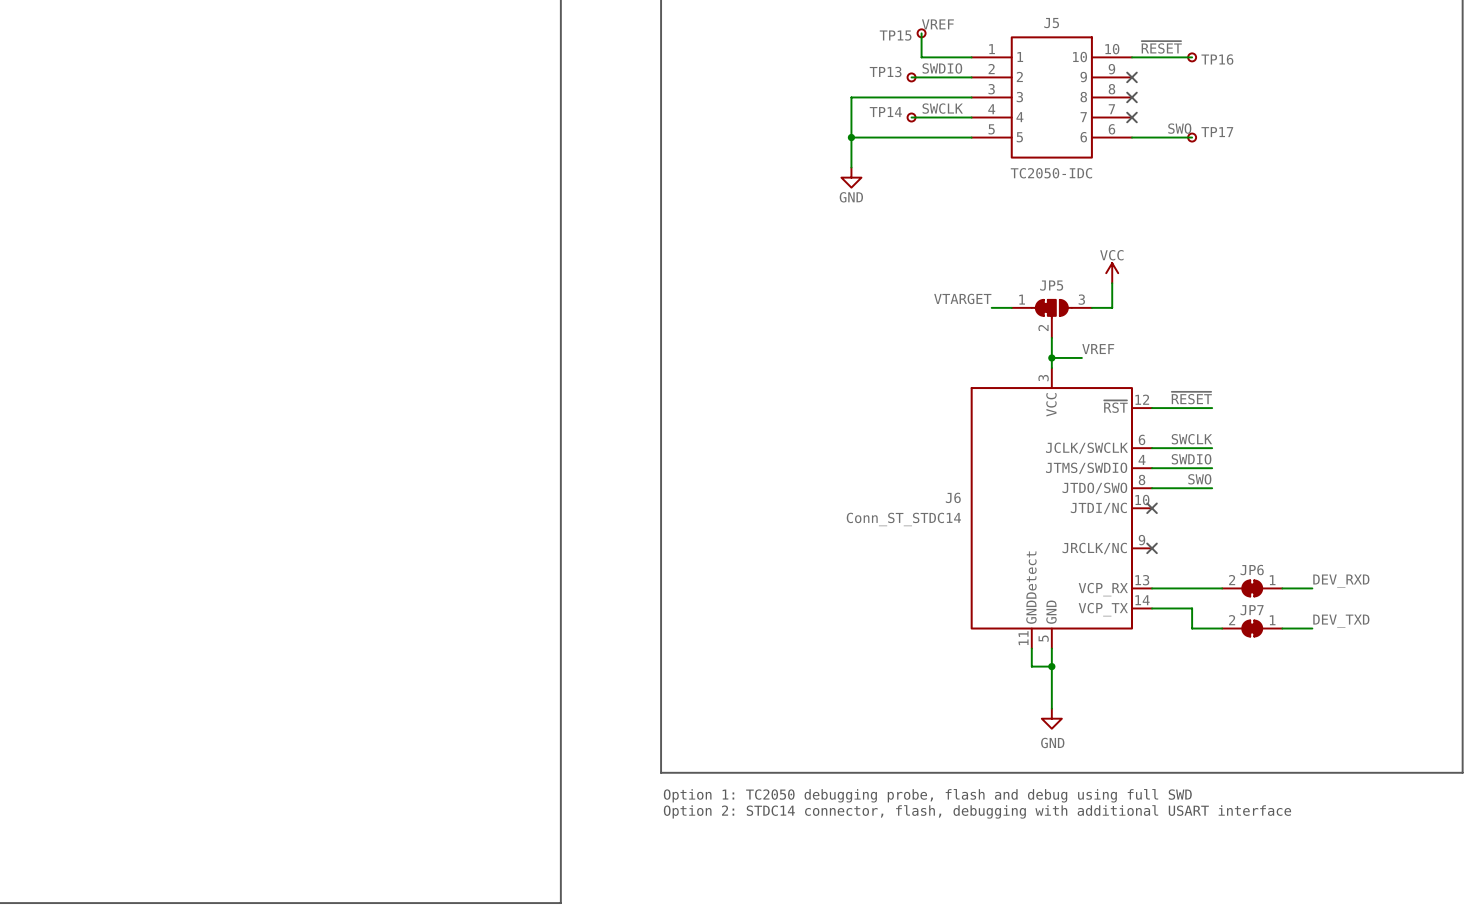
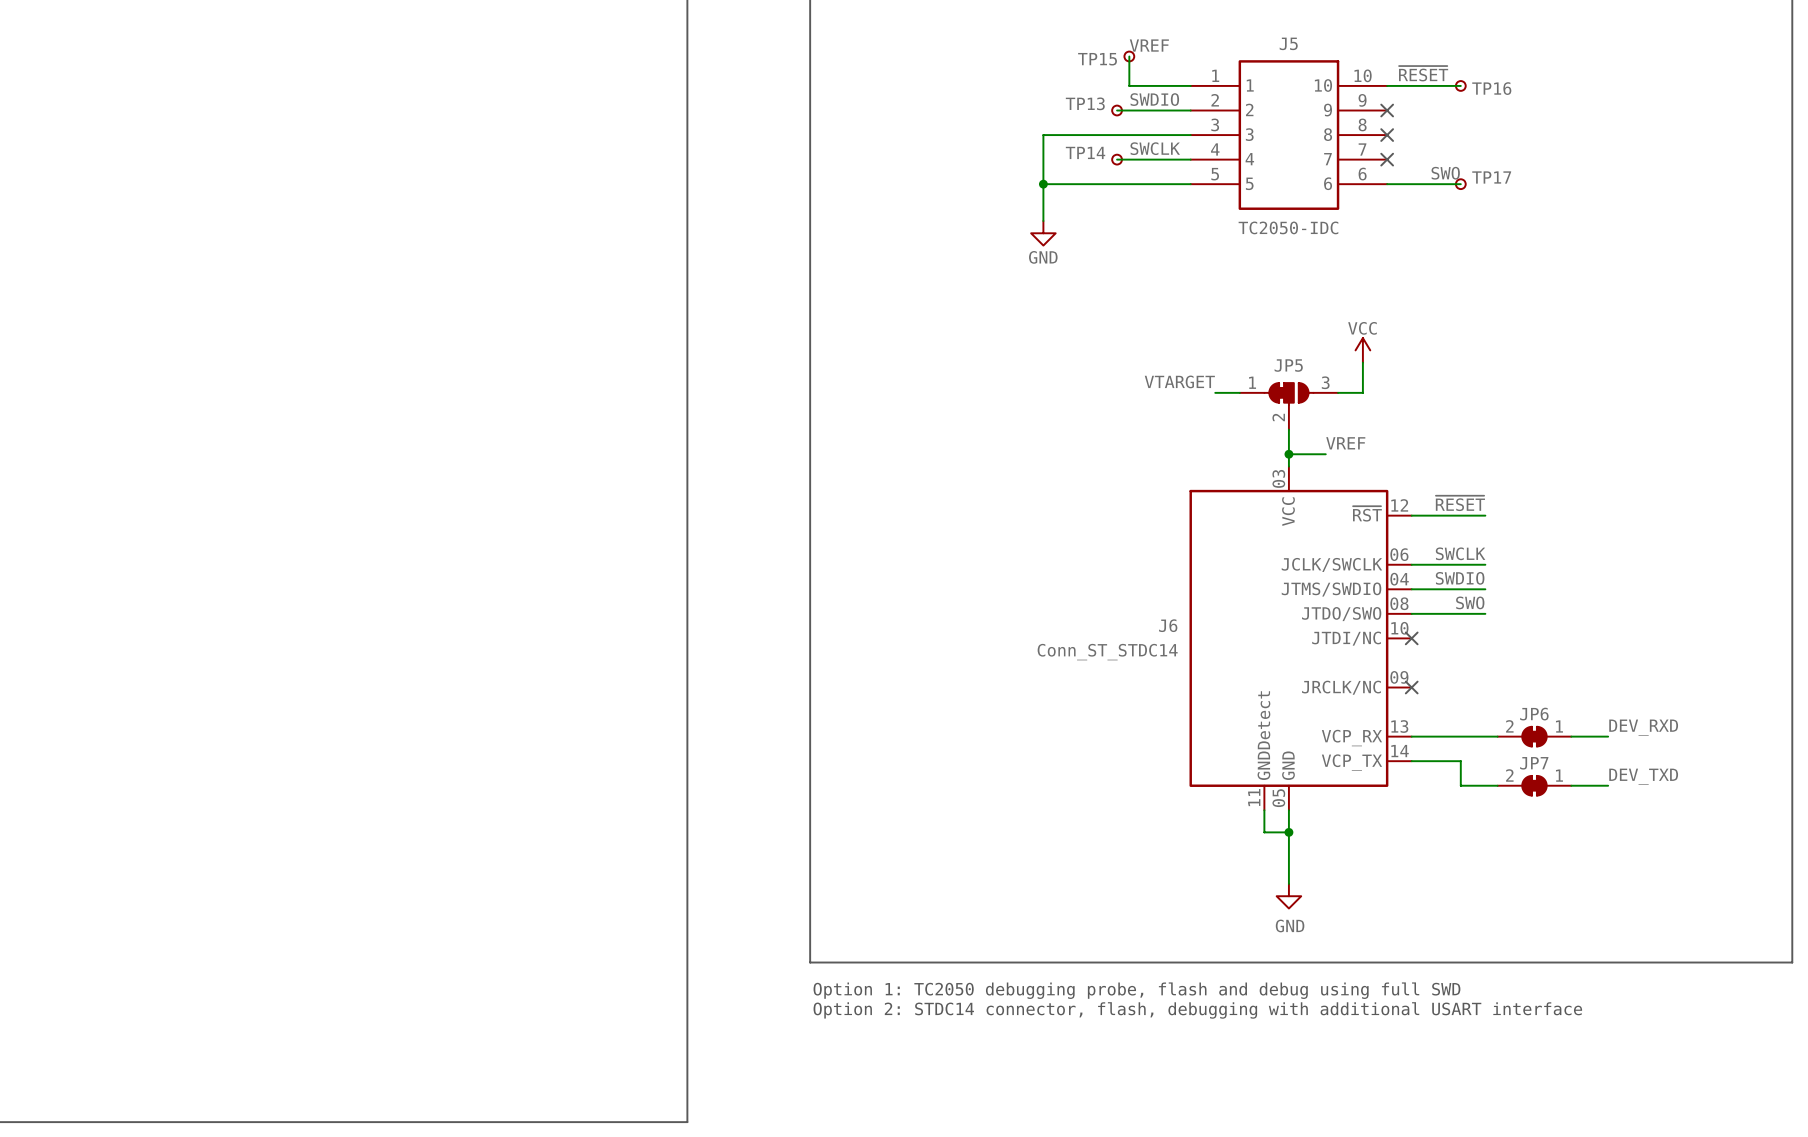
J6 pin number: 3 (1043, 378) -> 03 (1278, 478)
J6 pin number: 6 (1142, 439) -> 06 (1399, 554)
J6 pin number: 4 (1142, 459) -> 04 (1399, 579)
J6 pin number: 8 (1142, 479) -> 08 (1399, 603)
J6 pin number: 9 (1141, 540) -> 09 (1399, 677)
J6 pin number: 5 (1043, 638) -> 05 (1278, 798)

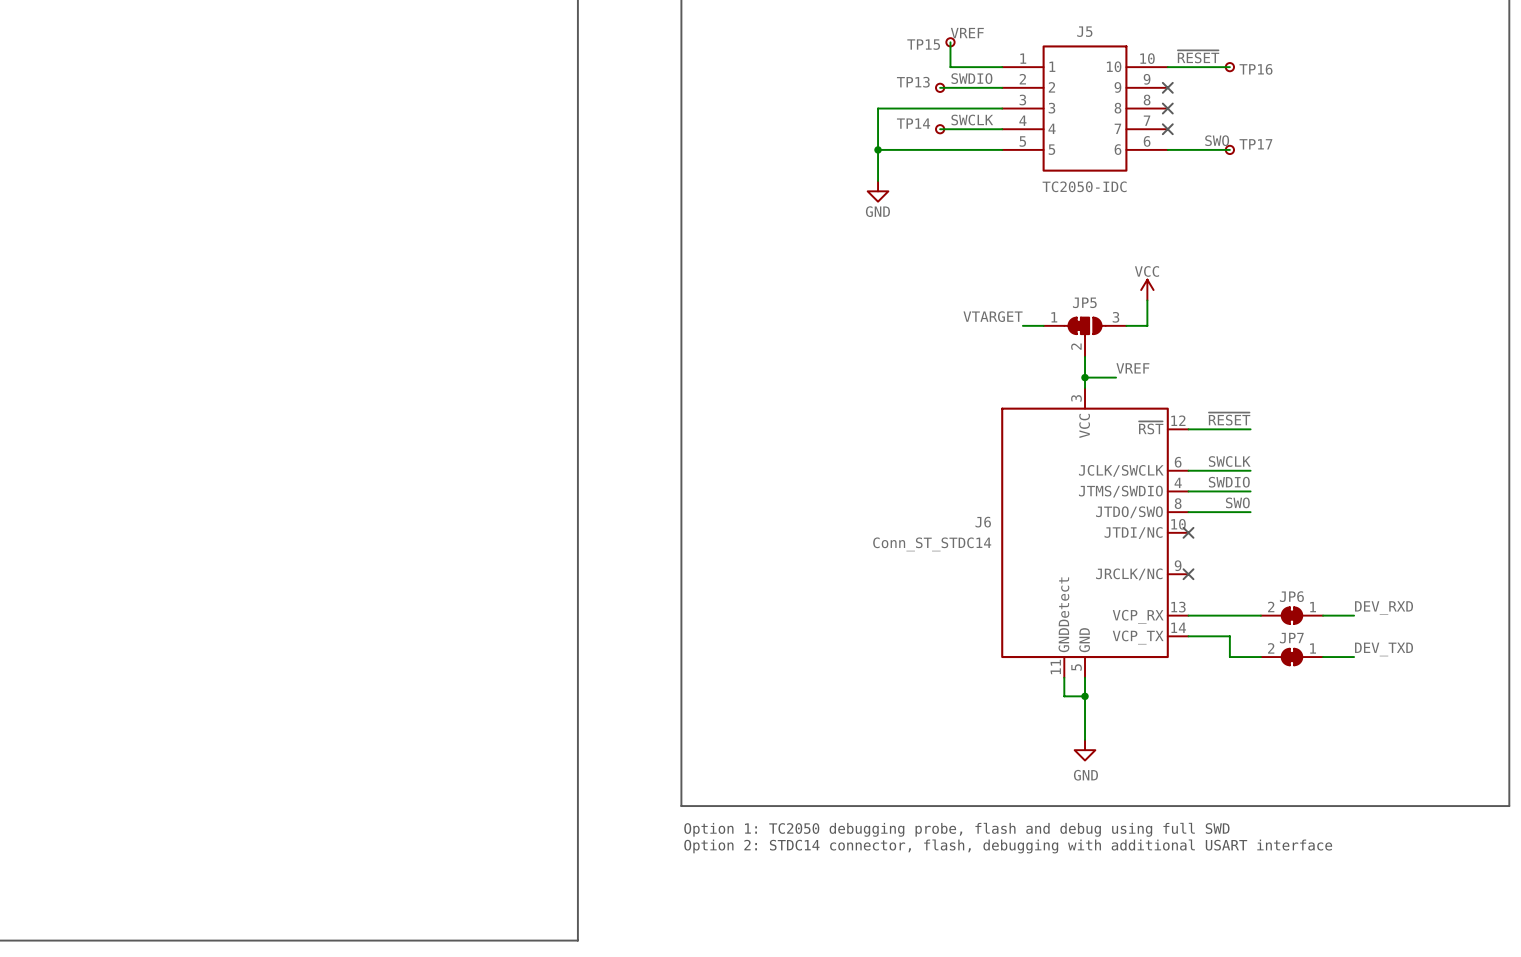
J6 pin number: 03 (1278, 478) -> 3 (1076, 398)
J6 pin number: 06 (1399, 554) -> 6 (1178, 462)
J6 pin number: 04 (1399, 579) -> 4 (1178, 482)
J6 pin number: 08 (1399, 603) -> 8 (1178, 503)
J6 pin number: 09 (1399, 677) -> 9 (1178, 565)
J6 pin number: 05 (1278, 798) -> 5 (1076, 667)

